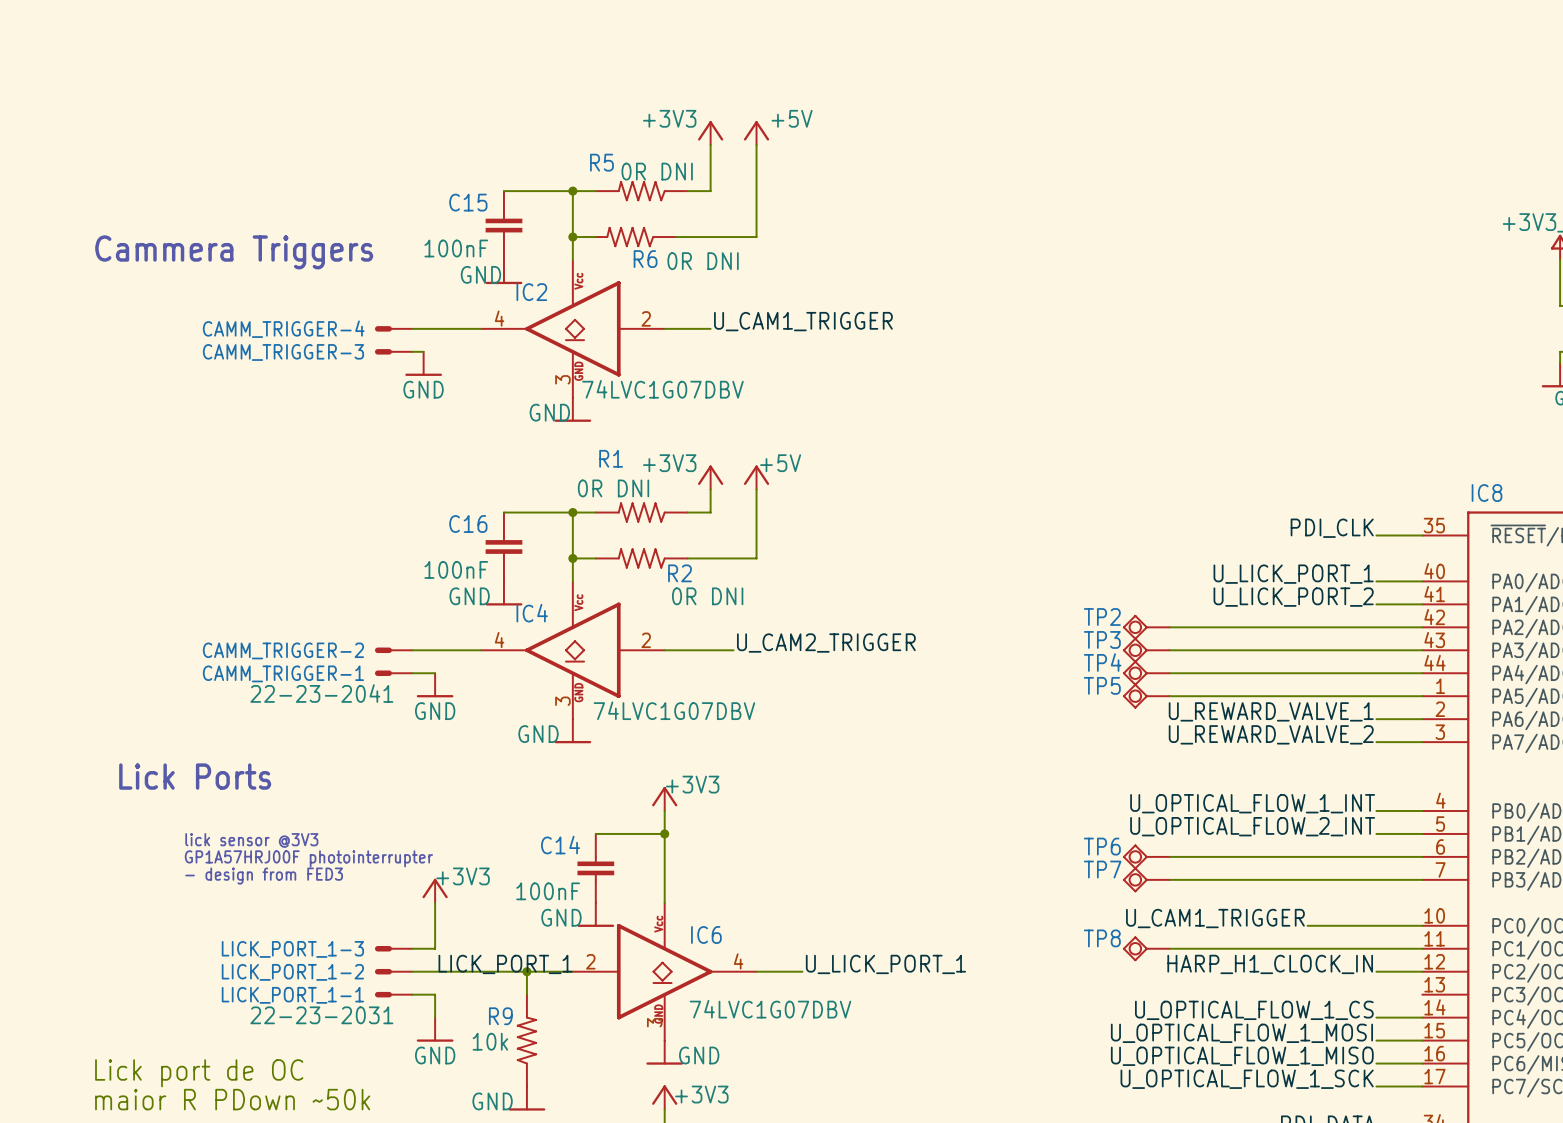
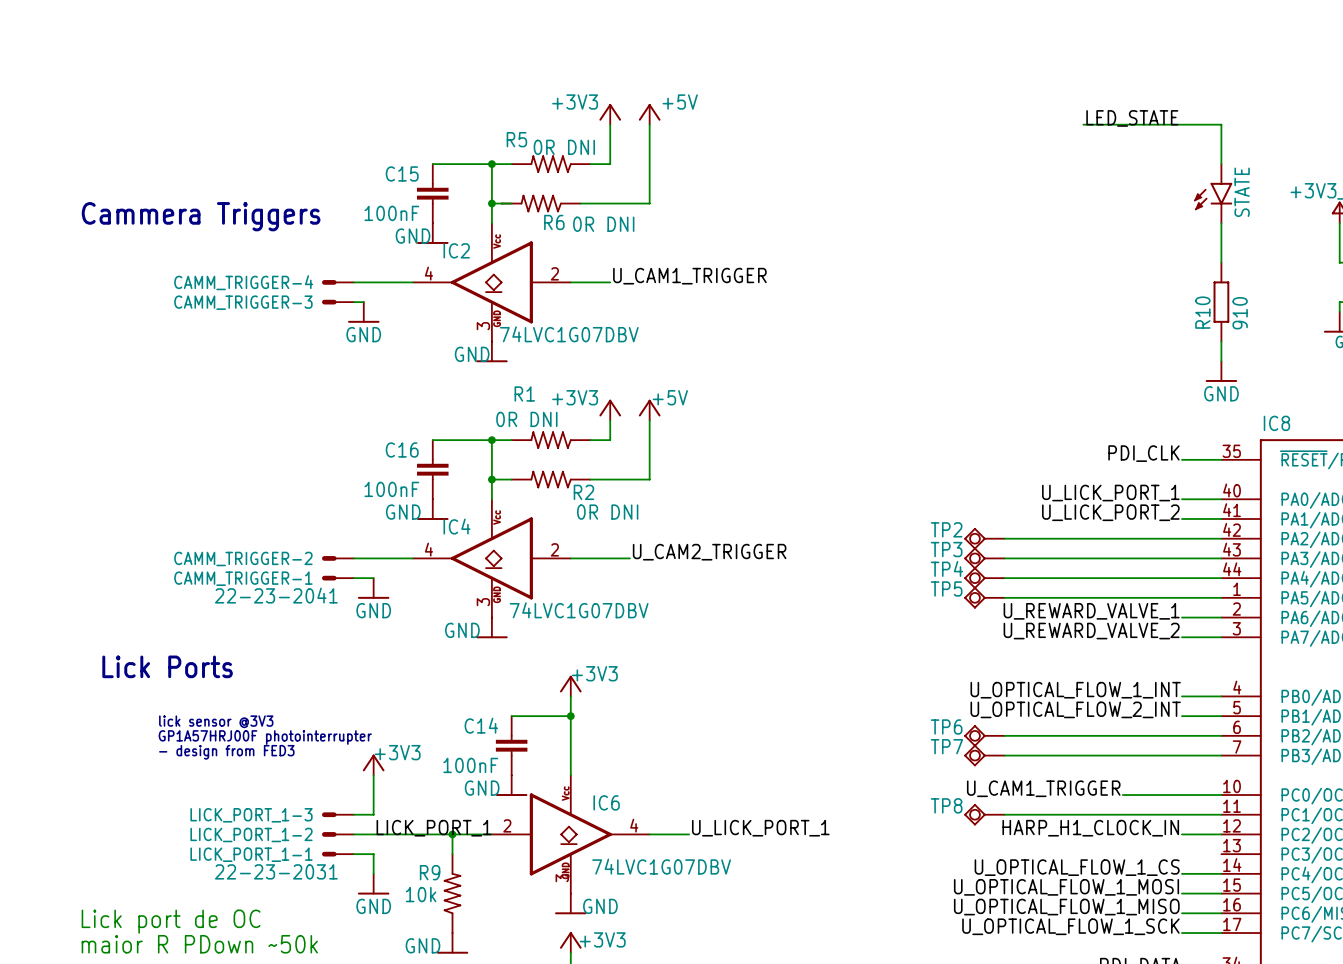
label: none -> LED_STATE (1132, 118)
wire: none -> (1083, 124) (1221, 124) (1221, 164)
STATE: none -> (1213, 193)
wire: none -> (1221, 223) (1221, 262)
R10: none -> 910 (1221, 302)
wire: none -> (1221, 341) (1221, 361)
power symbol: none -> GND (1221, 371)

